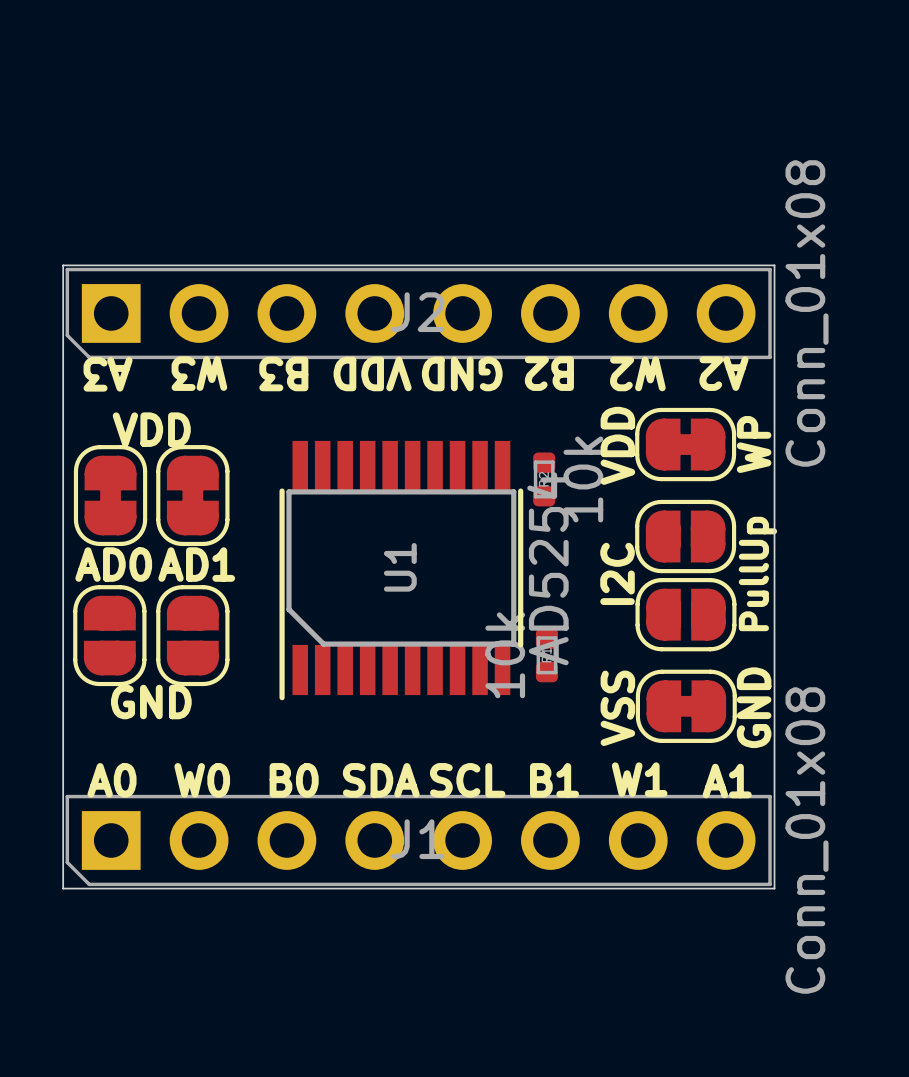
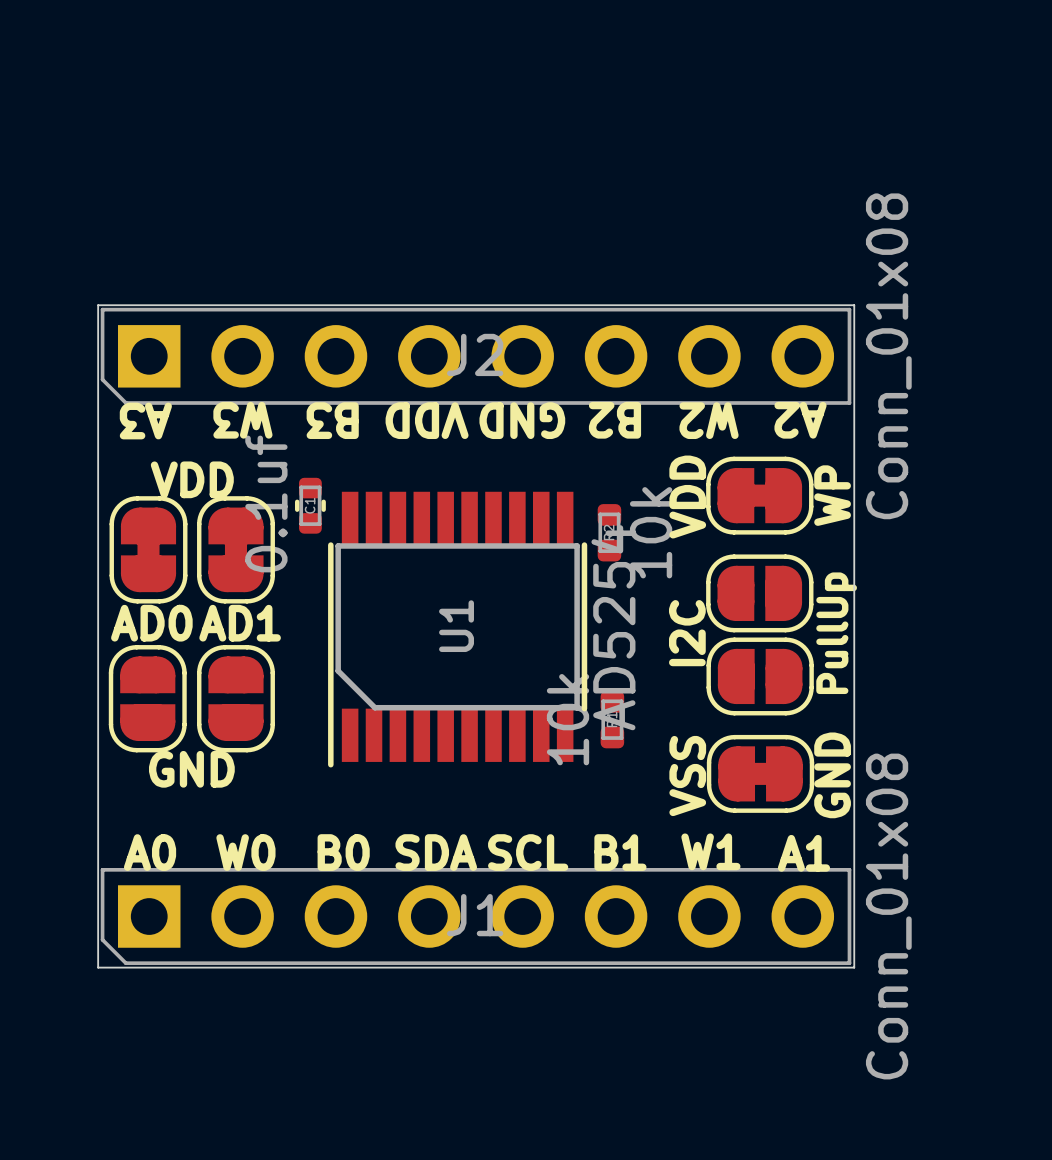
C1: none -> 0.1uf (310, 505)

